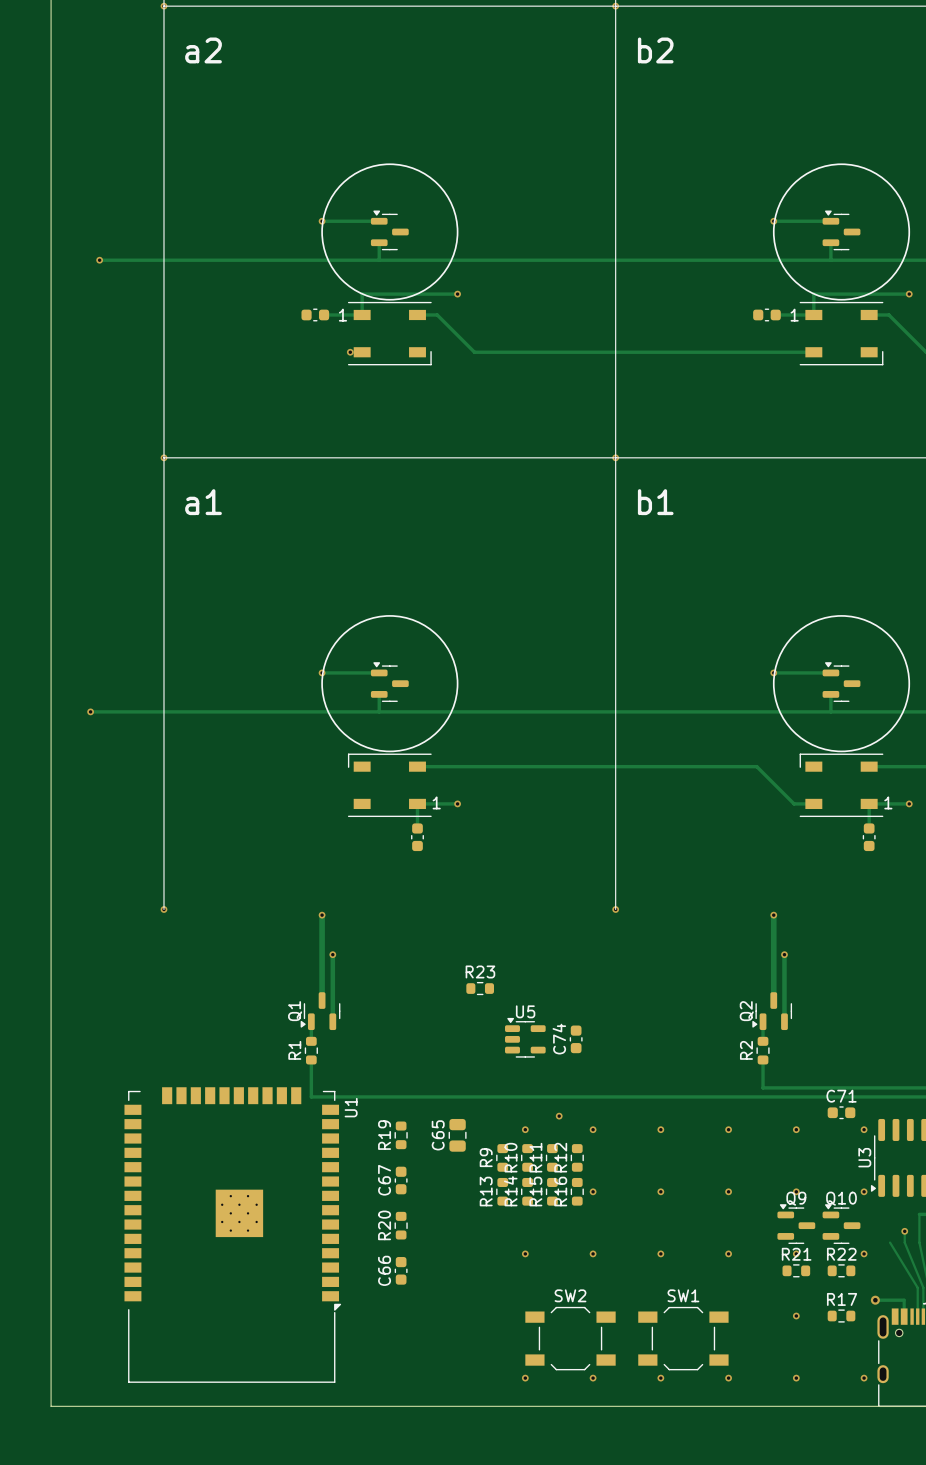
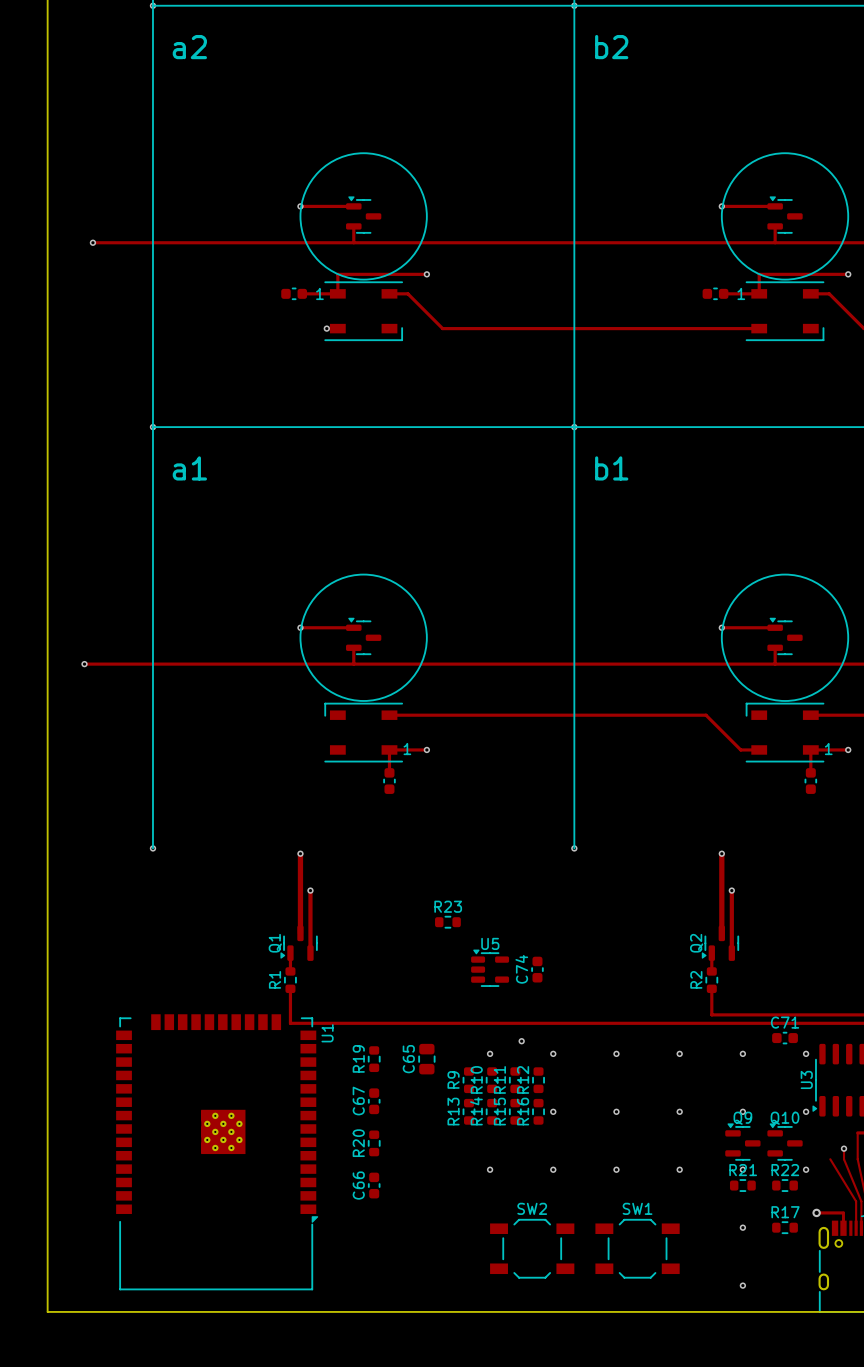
via: (525, 1378) -> none
via: (593, 1378) -> none
via: (660, 1378) -> none
via: (728, 1378) -> none
via: (864, 1378) -> none

